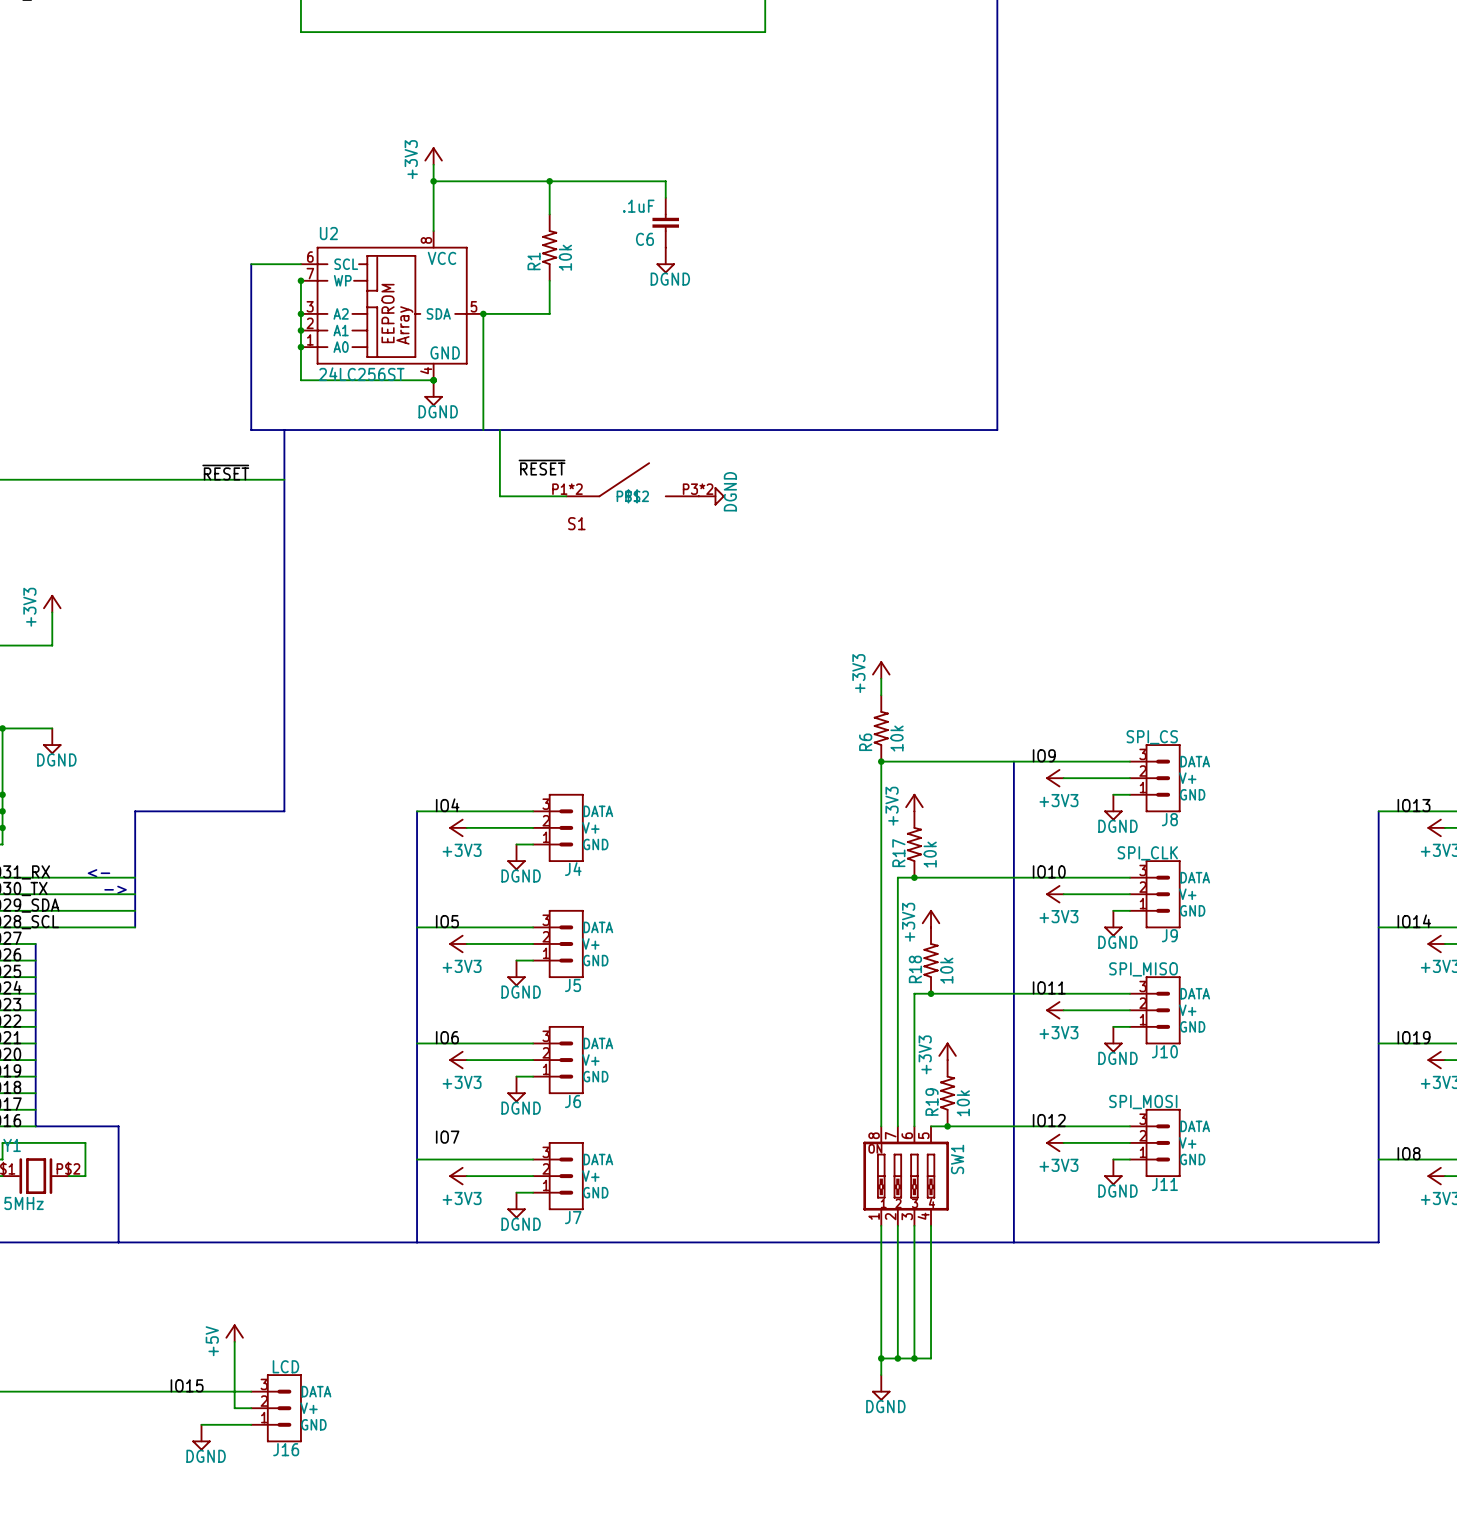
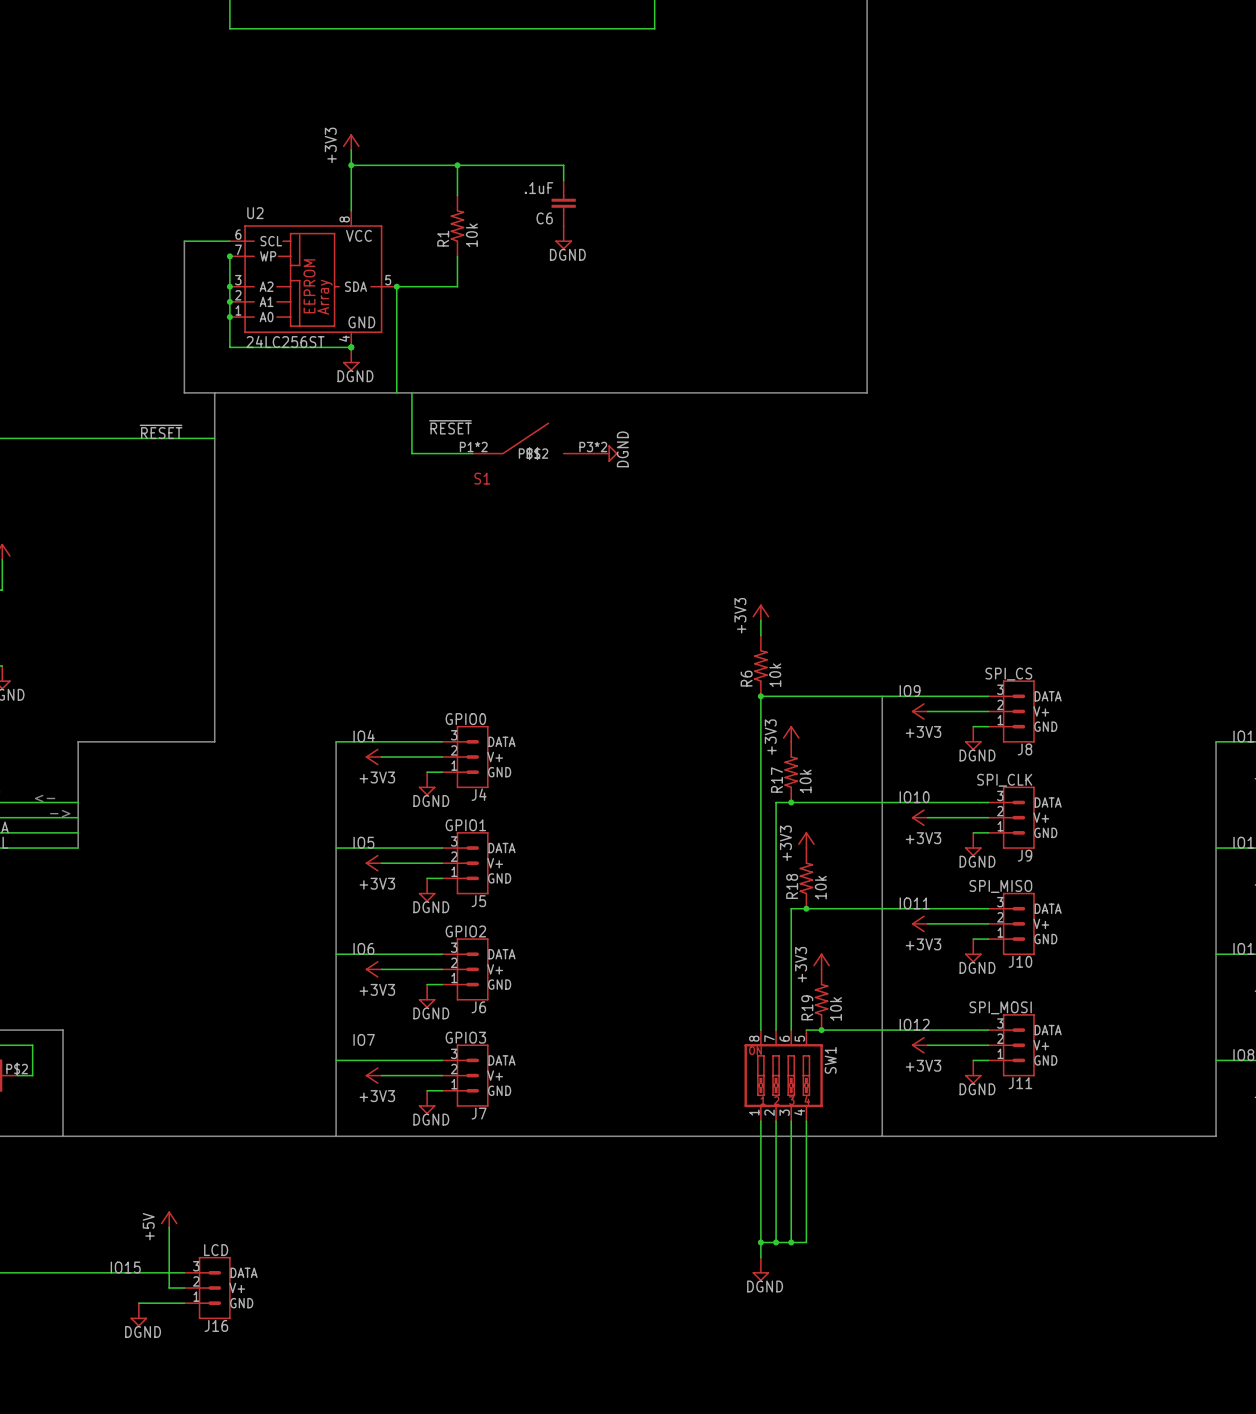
J4 value: none -> GPIO0 (465, 719)
J5 value: none -> GPIO1 (465, 825)
J6 value: none -> GPIO2 (465, 931)
J7 value: none -> GPIO3 (465, 1037)

